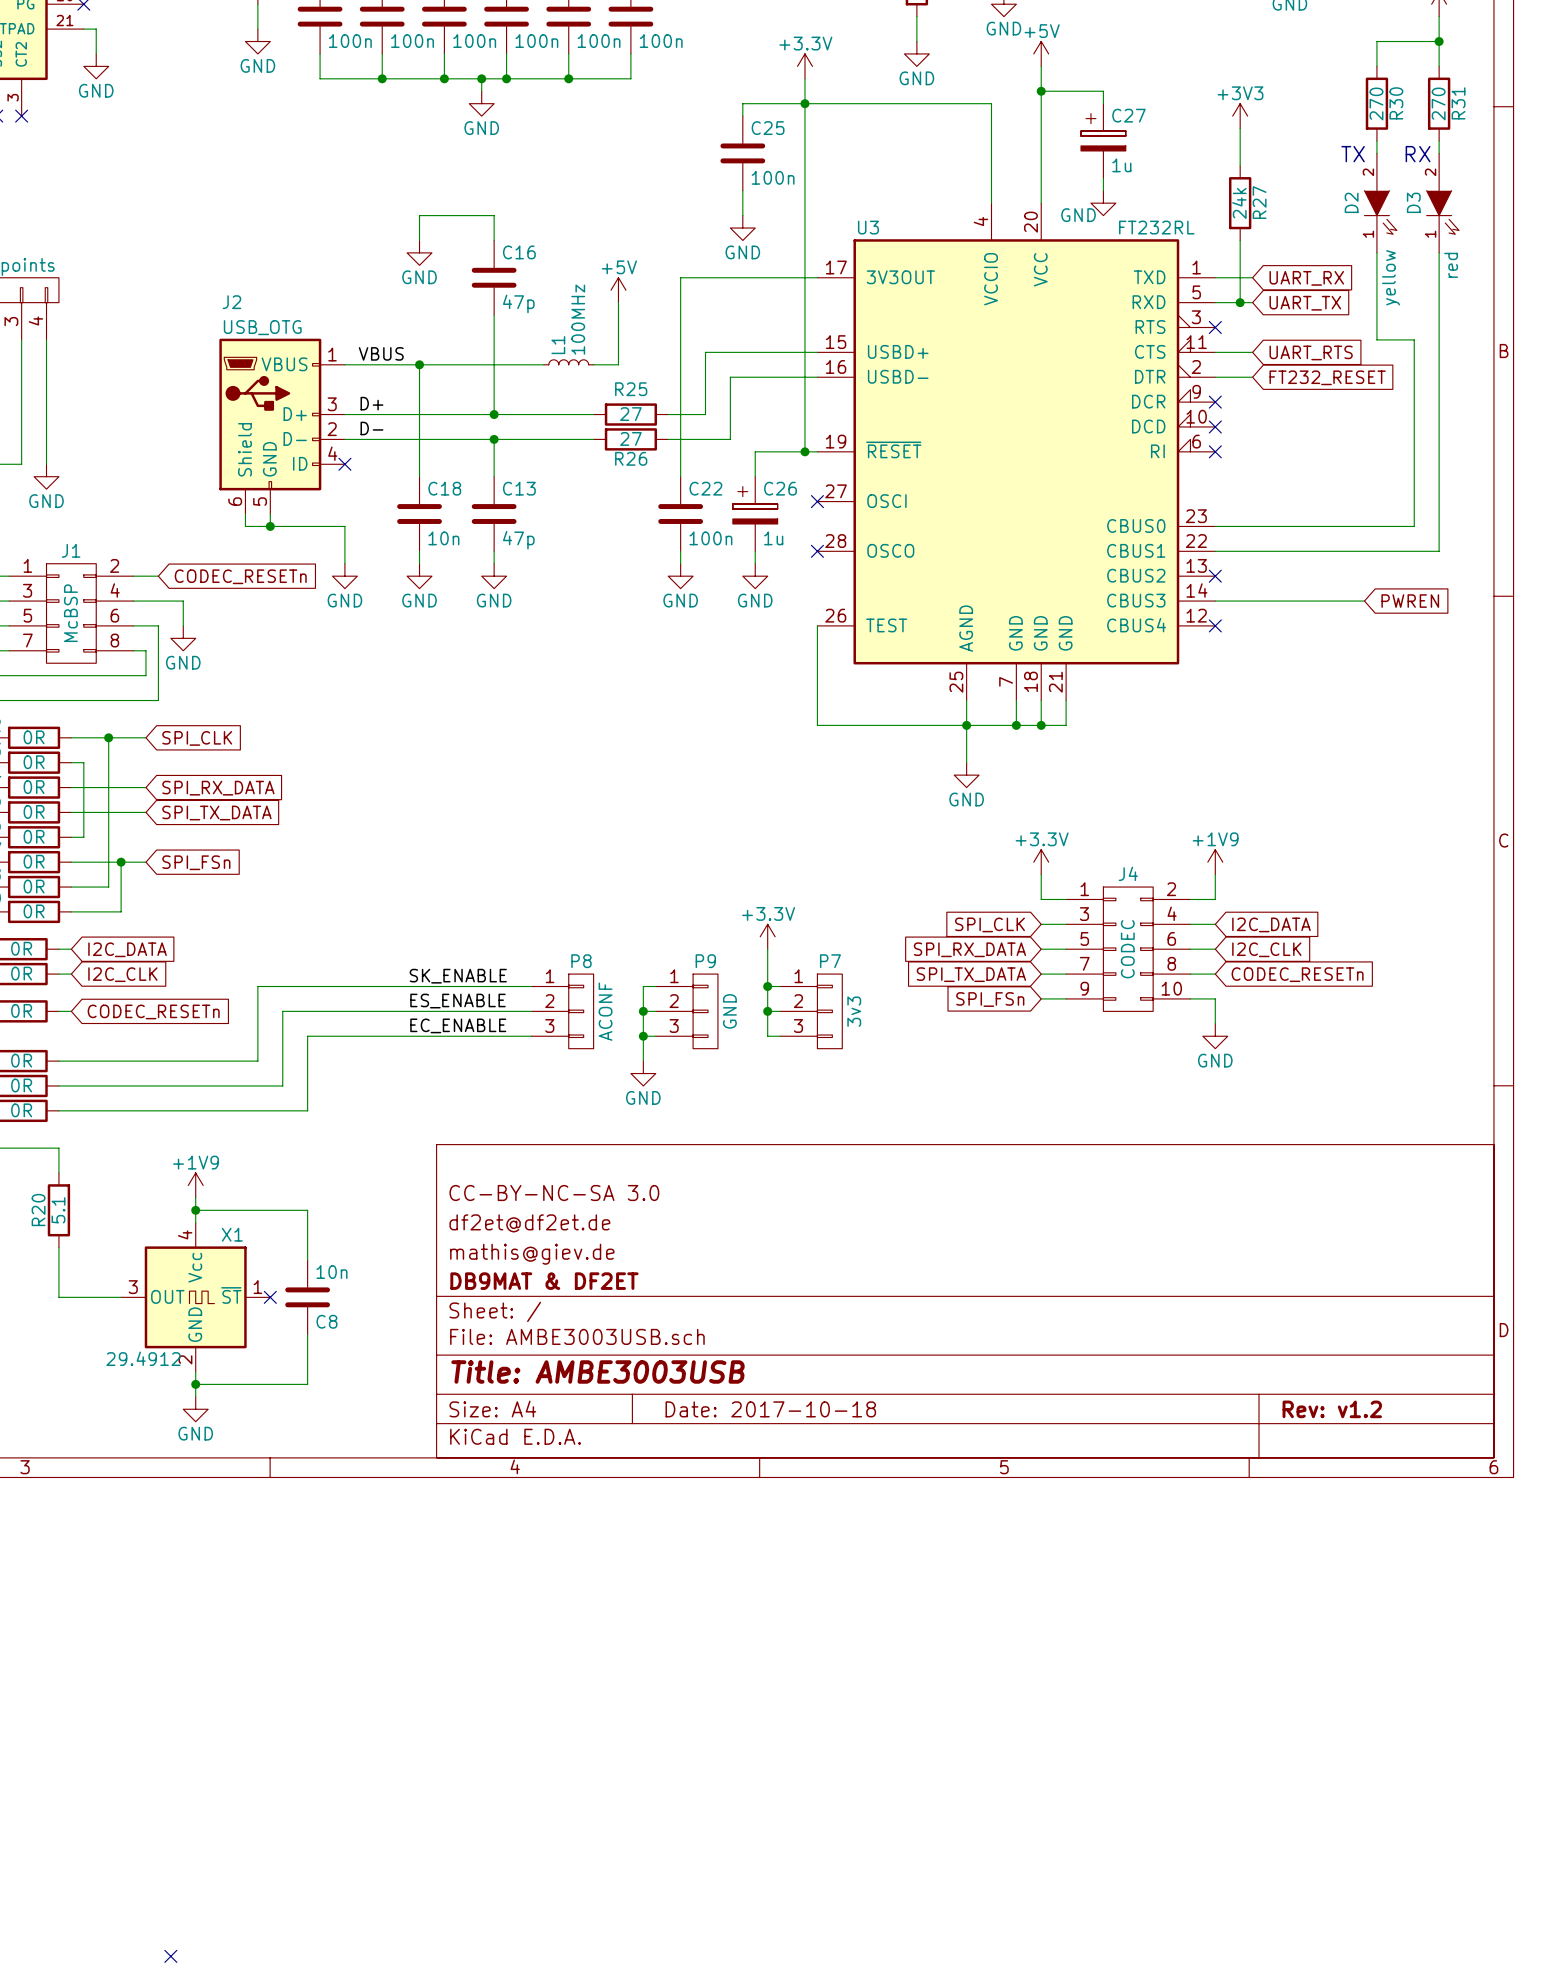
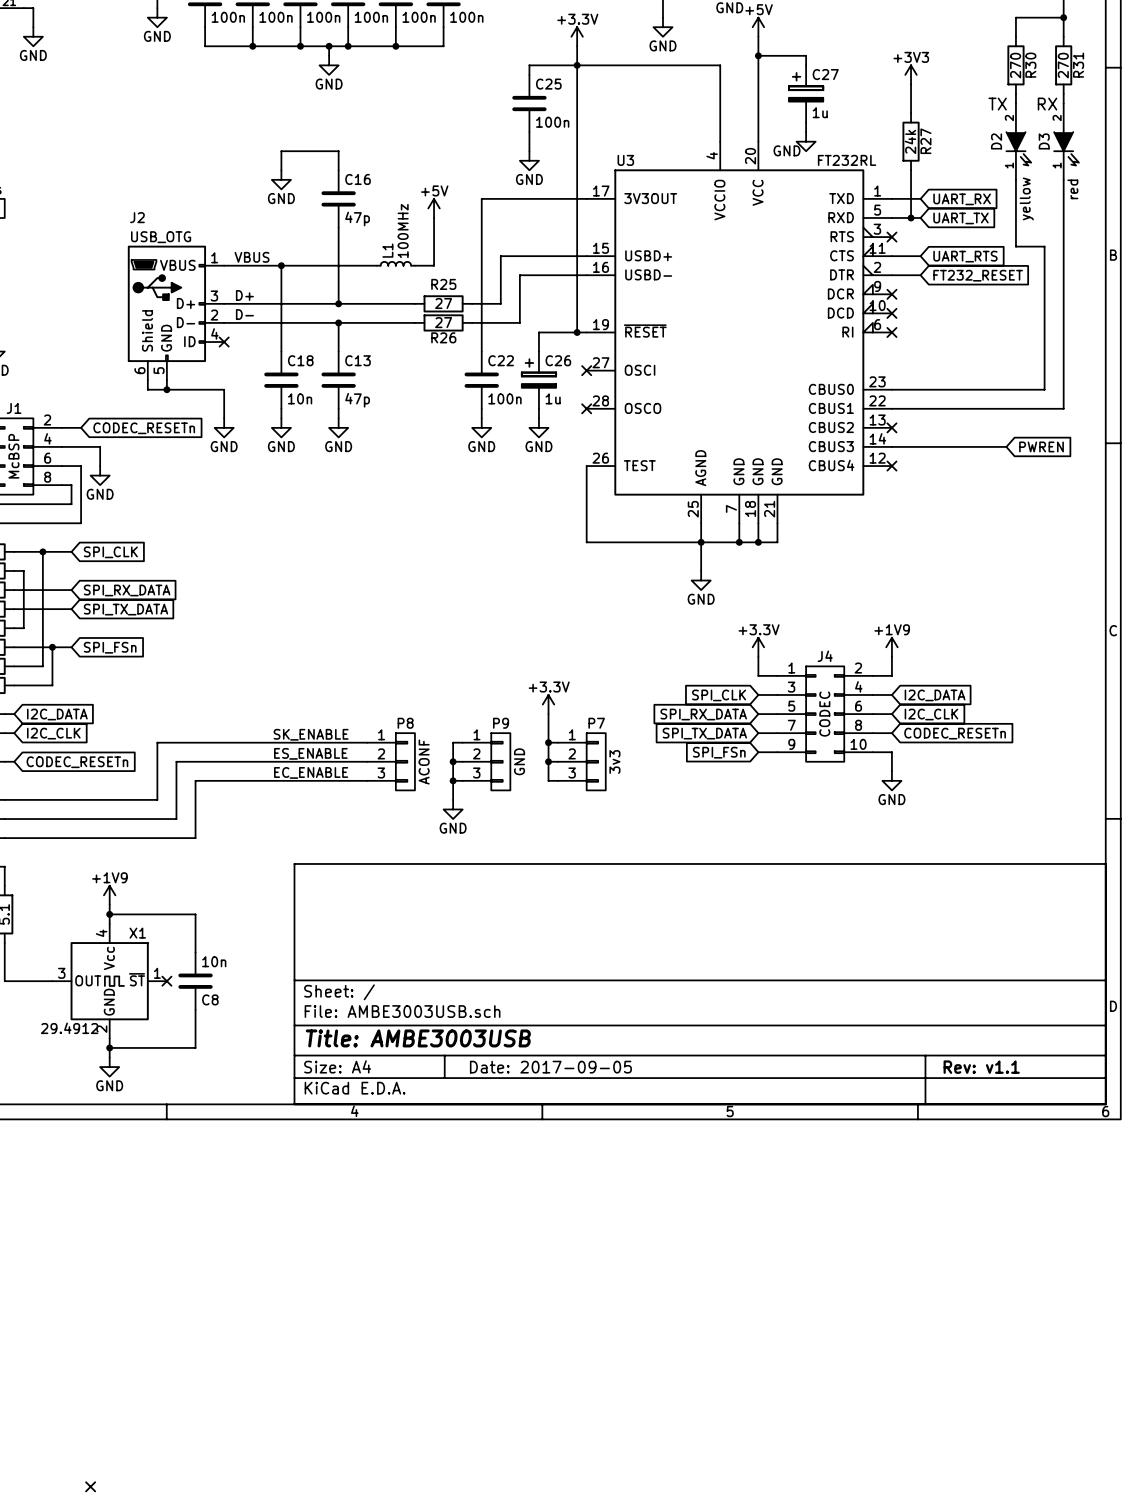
title block: CC-BY-NC-SA 3.0 (554, 1193) -> none
title block: df2et@df2et.de (529, 1223) -> none
title block: mathis@giev.de (532, 1254) -> none
title block: DB9MAT & DF2ET (544, 1281) -> none
title block: Date: 2017-10-18 (770, 1409) -> Date: 2017-09-05 (550, 1067)
title block: Rev: v1.2 (1332, 1409) -> Rev: v1.1 (981, 1067)

